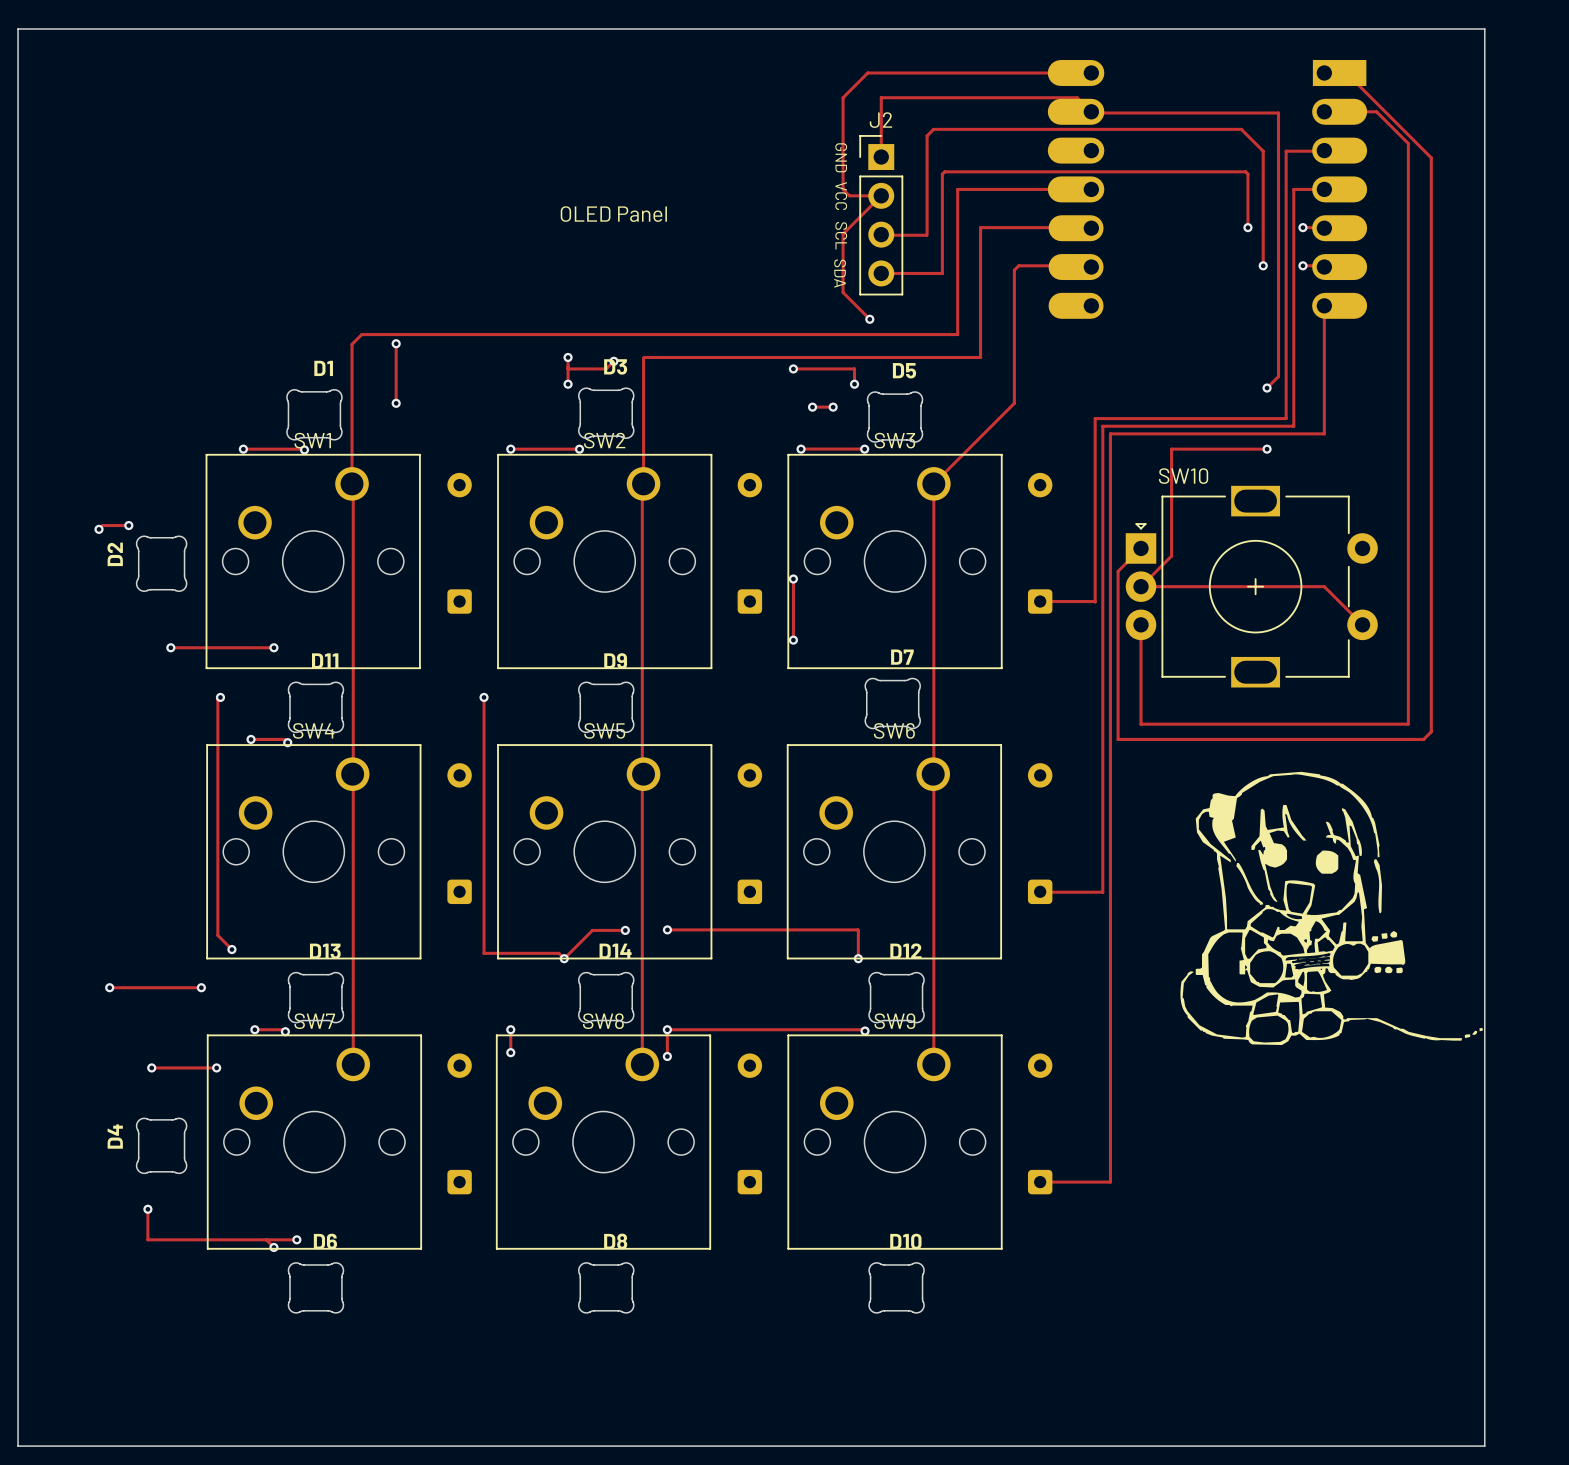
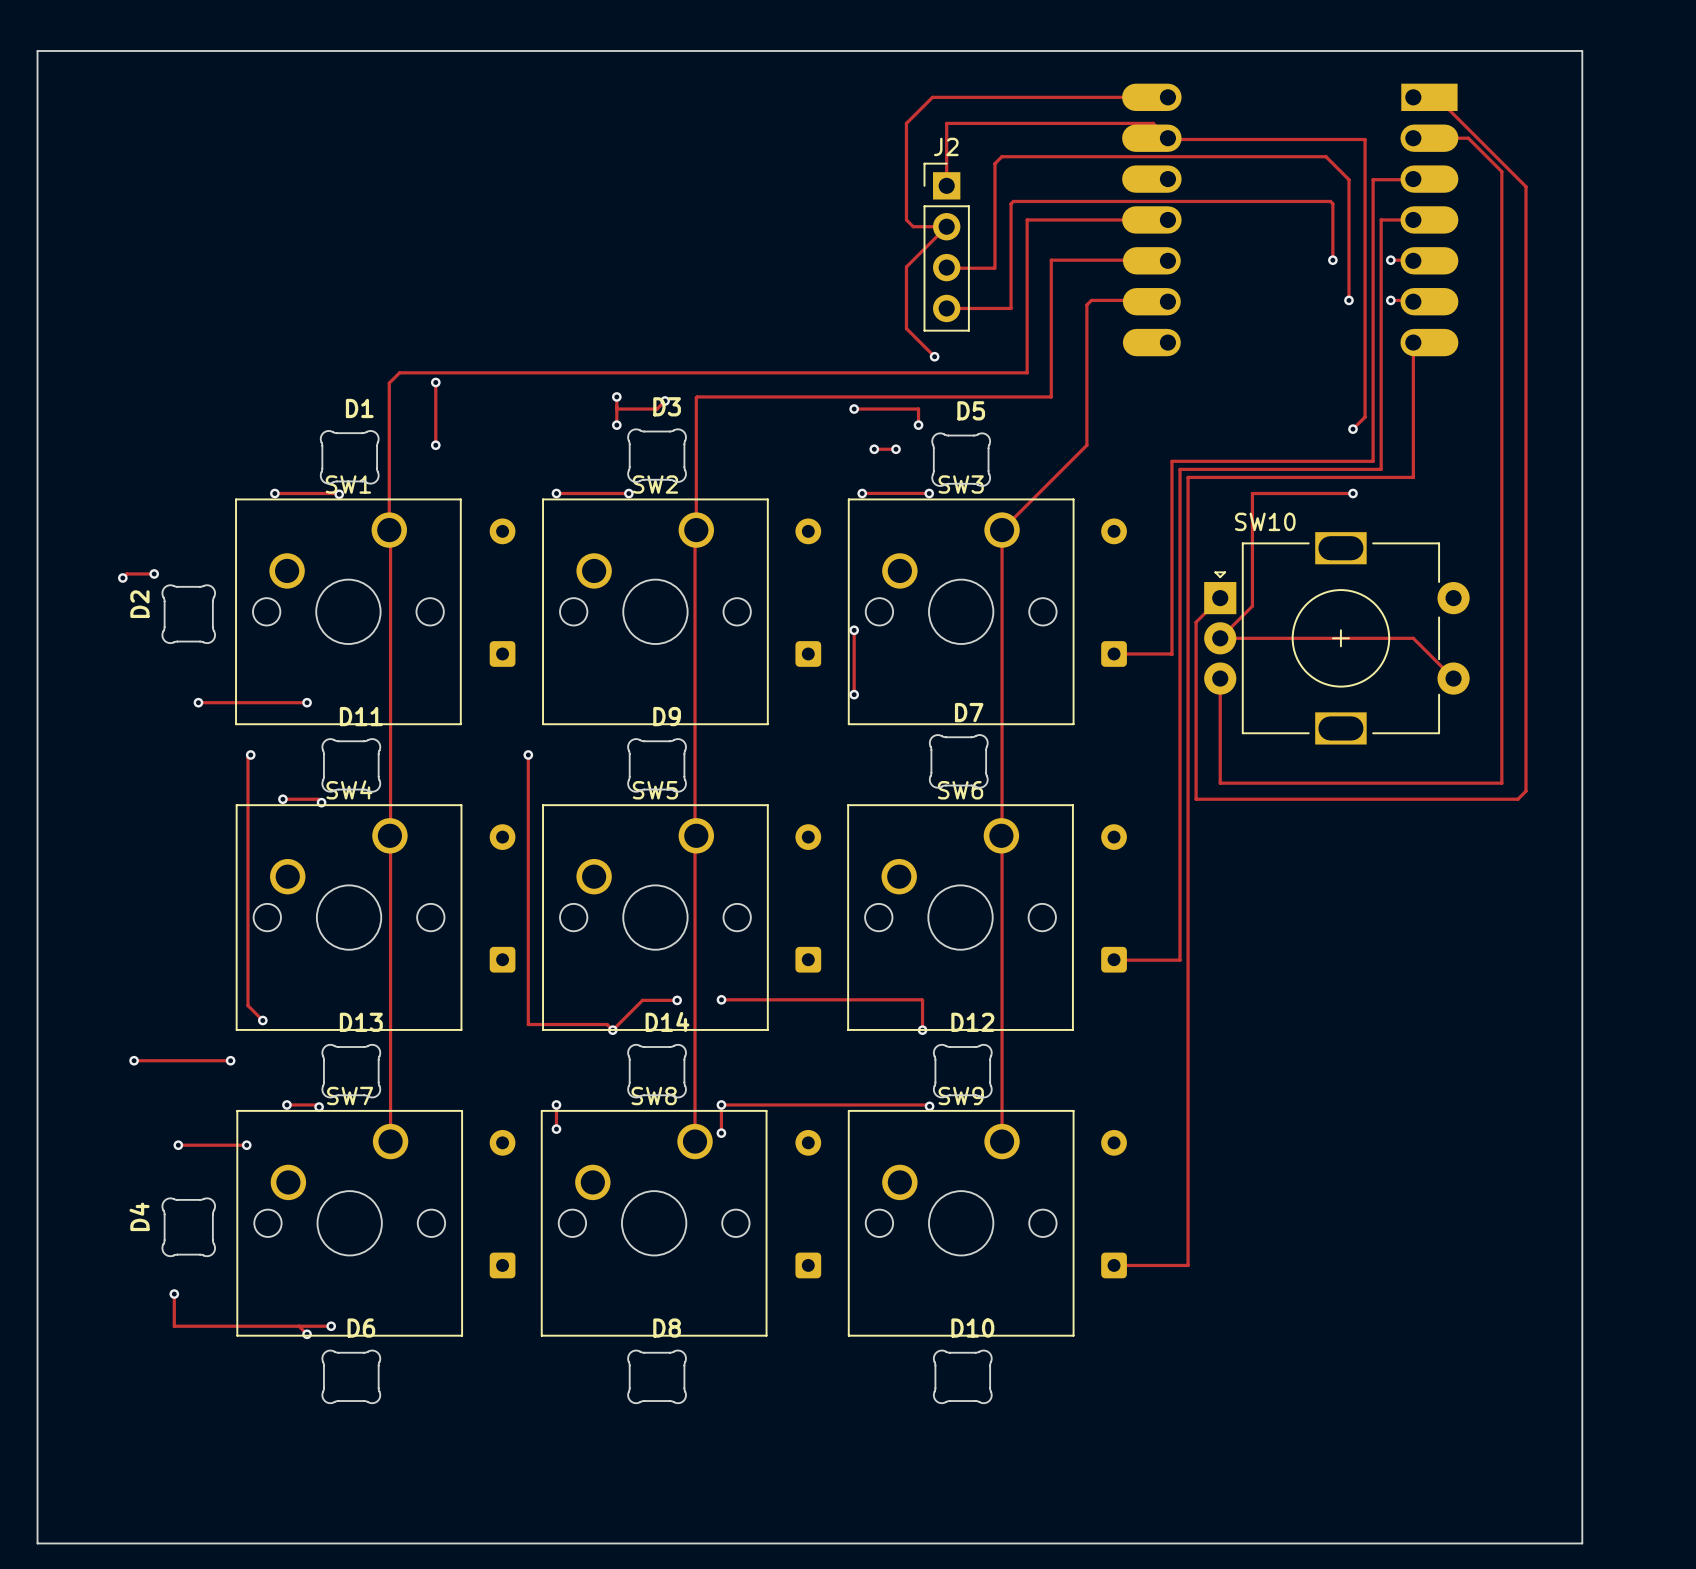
text: GND (841, 157) -> none
text: VCC (841, 196) -> none
text: OLED Panel (613, 214) -> none
text: SCL (841, 235) -> none
text: SDA (840, 273) -> none
drawing: [1180, 771, 1483, 1046] -> none

